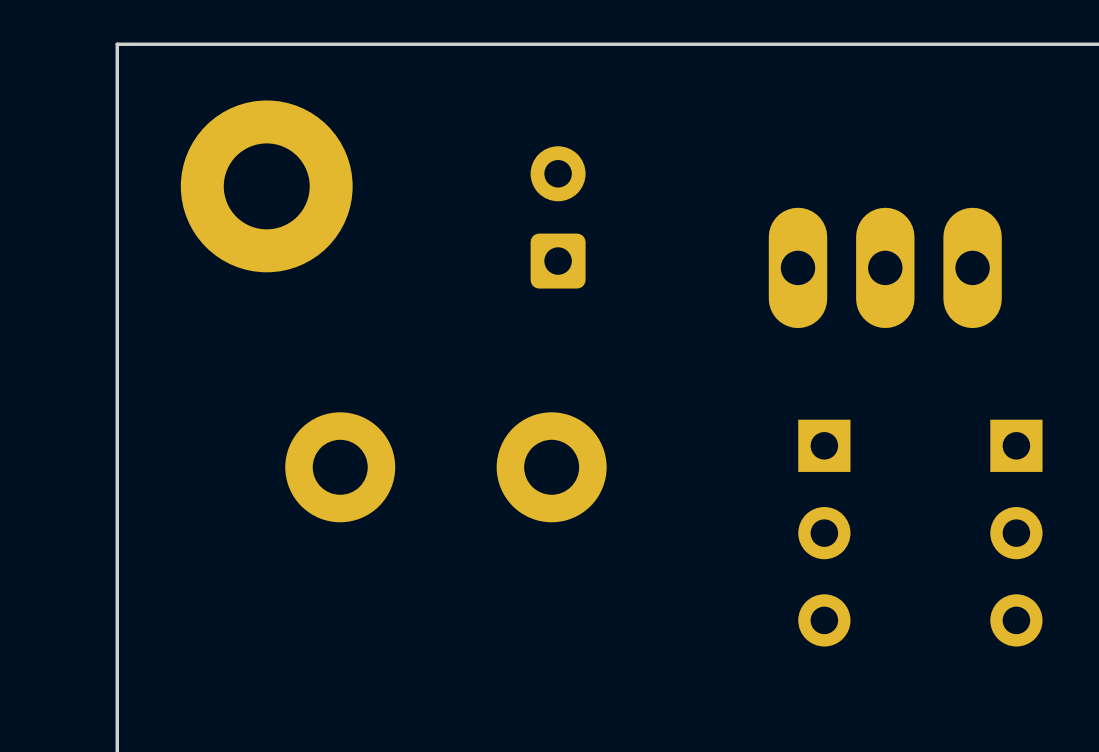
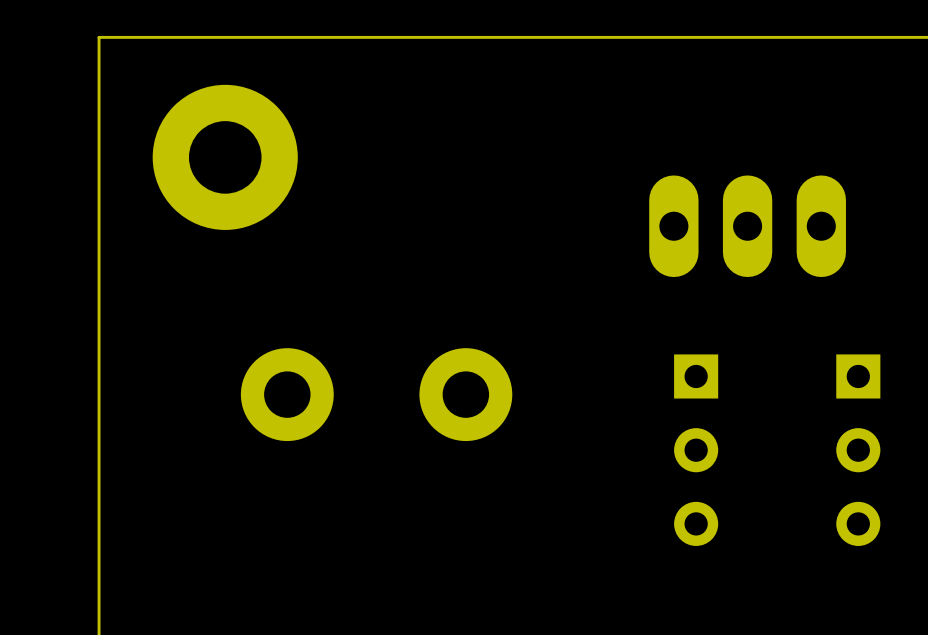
part: (558, 217) -> none

